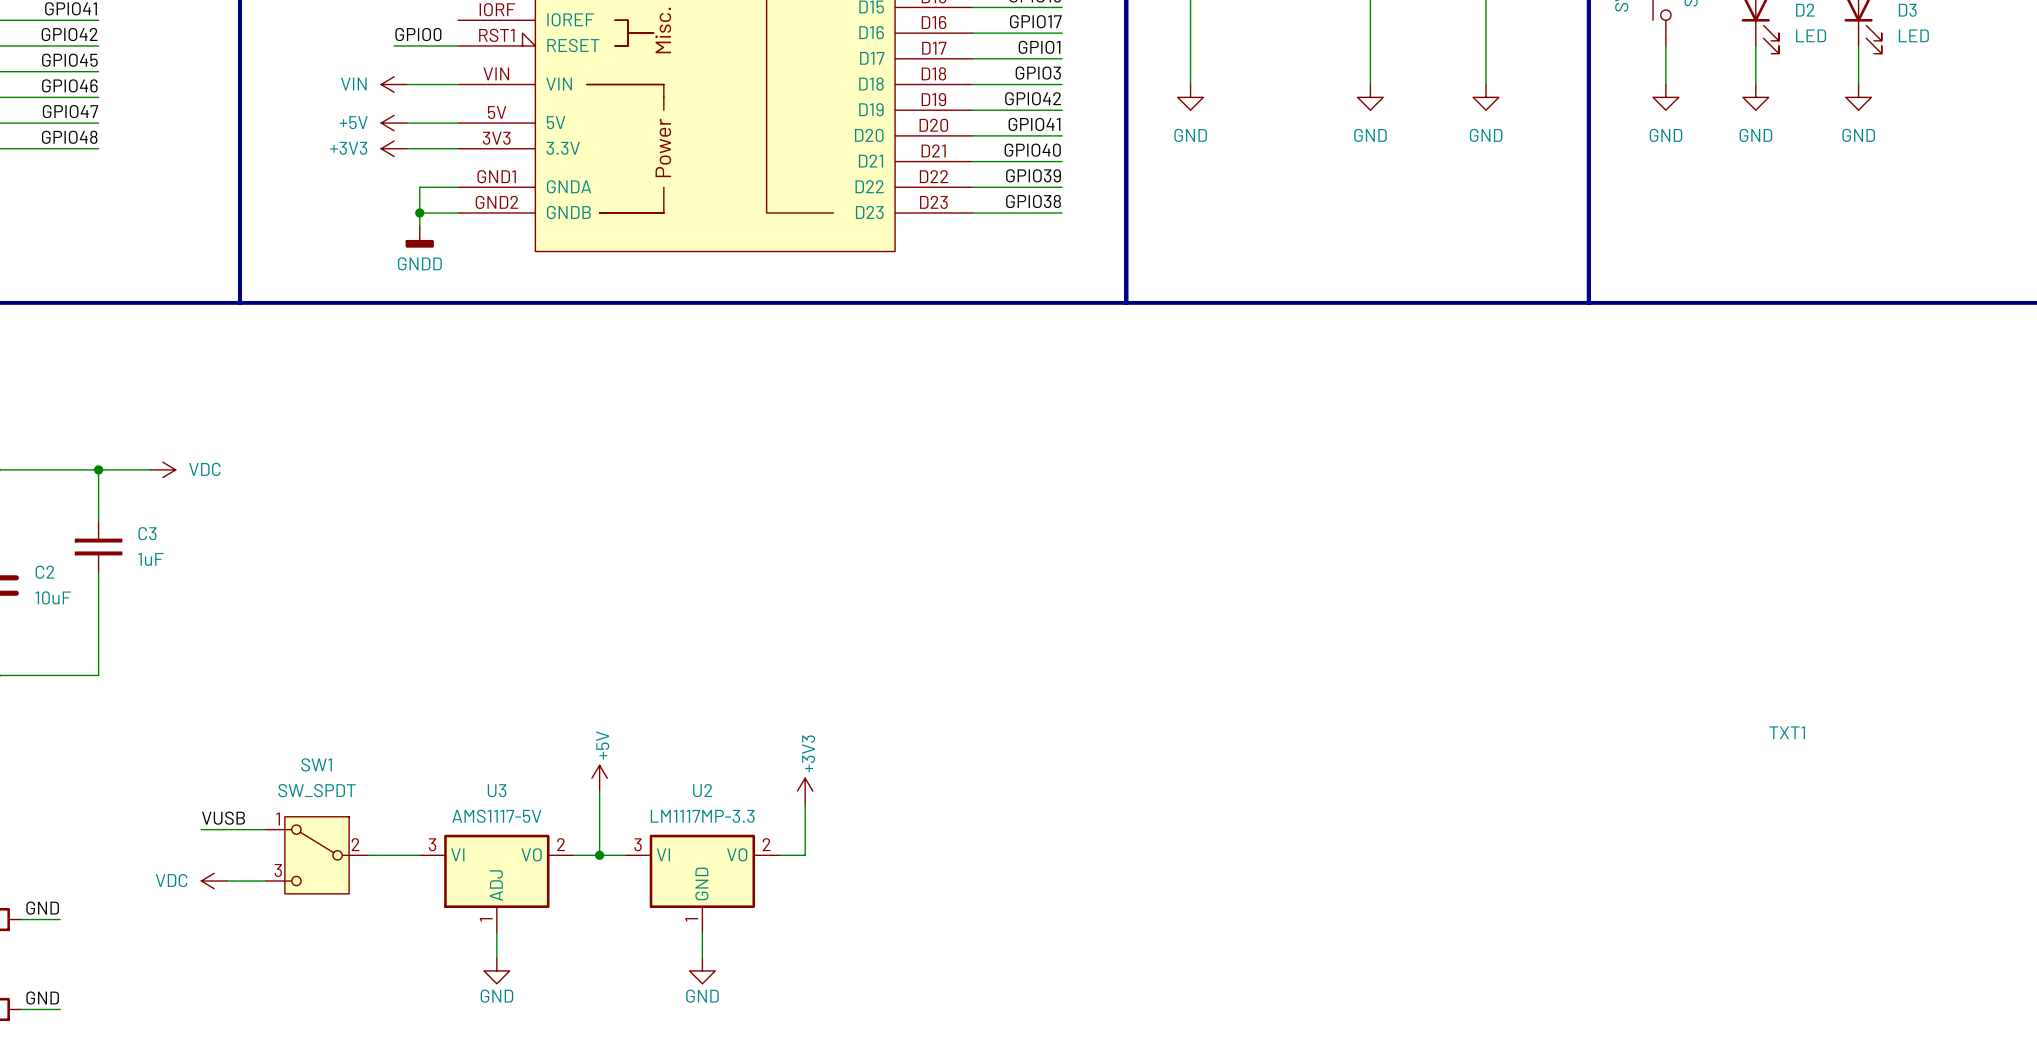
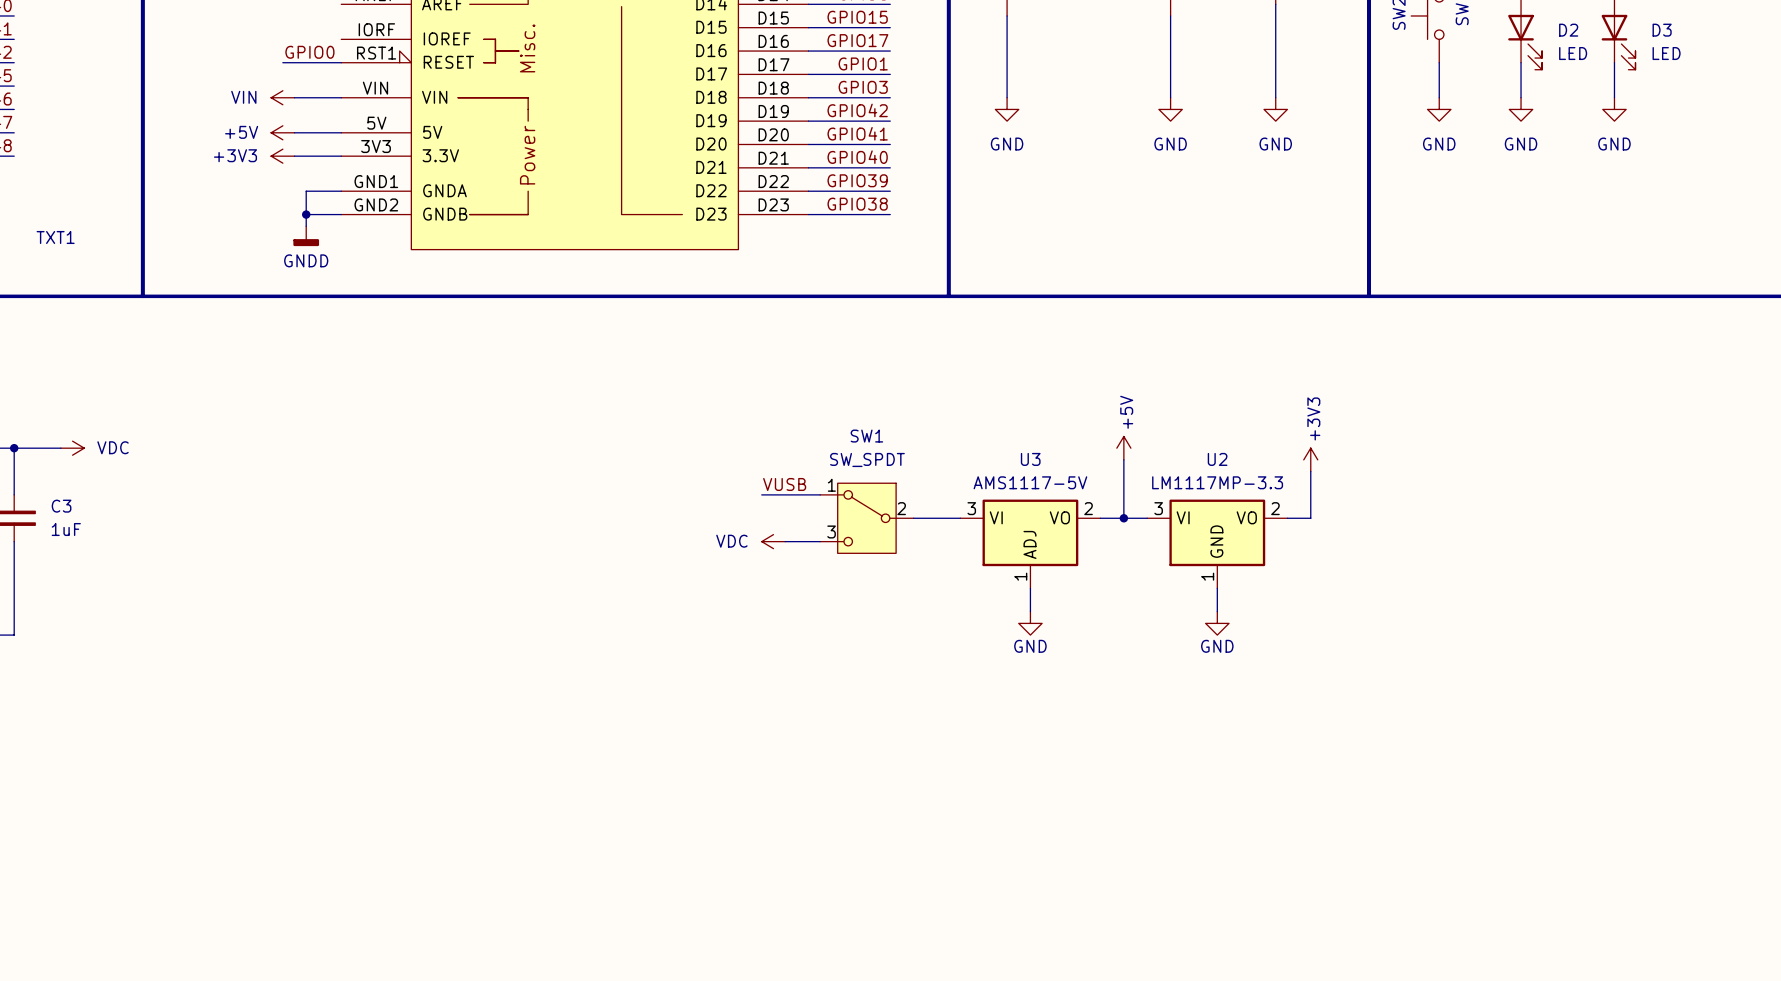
power symbol: none -> +5V (1123, 448)
wire: none -> (1123, 459) (1123, 518)
power symbol: none -> +3V3 (1310, 459)
wire: none -> (1310, 471) (1310, 518) (1287, 518)
label: none -> VUSB (784, 484)
wire: none -> (761, 494) (820, 494)
wire: none -> (913, 518) (960, 518)
wire: none -> (1100, 518) (1147, 518)
junction: none -> (1123, 518)
power symbol: none -> VDC (773, 541)
wire: none -> (785, 541) (820, 541)
wire: none -> (1030, 588) (1030, 611)
wire: none -> (1217, 588) (1217, 611)
power symbol: none -> GND (1030, 623)
power symbol: none -> GND (1217, 623)
TXT1 position: (1787, 732) -> (55, 237)
power symbol: +5V (599, 778) -> none
wire: (599, 791) (599, 855) -> none
power symbol: +3V3 (805, 791) -> none
wire: (805, 803) (805, 855) (779, 855) -> none
label: VUSB (223, 818) -> none
wire: (201, 829) (265, 829) -> none
SW1 position: (316, 855) -> (866, 518)
wire: (368, 855) (419, 855) -> none
wire: (573, 855) (625, 855) -> none
junction: (599, 855) -> none
power symbol: VDC (214, 881) -> none
wire: (227, 881) (265, 881) -> none
U3 position: (496, 883) -> (1030, 543)
U2 position: (702, 883) -> (1217, 543)
wire: (496, 932) (496, 958) -> none
wire: (702, 932) (702, 958) -> none
power symbol: GND (496, 970) -> none
power symbol: GND (702, 970) -> none

